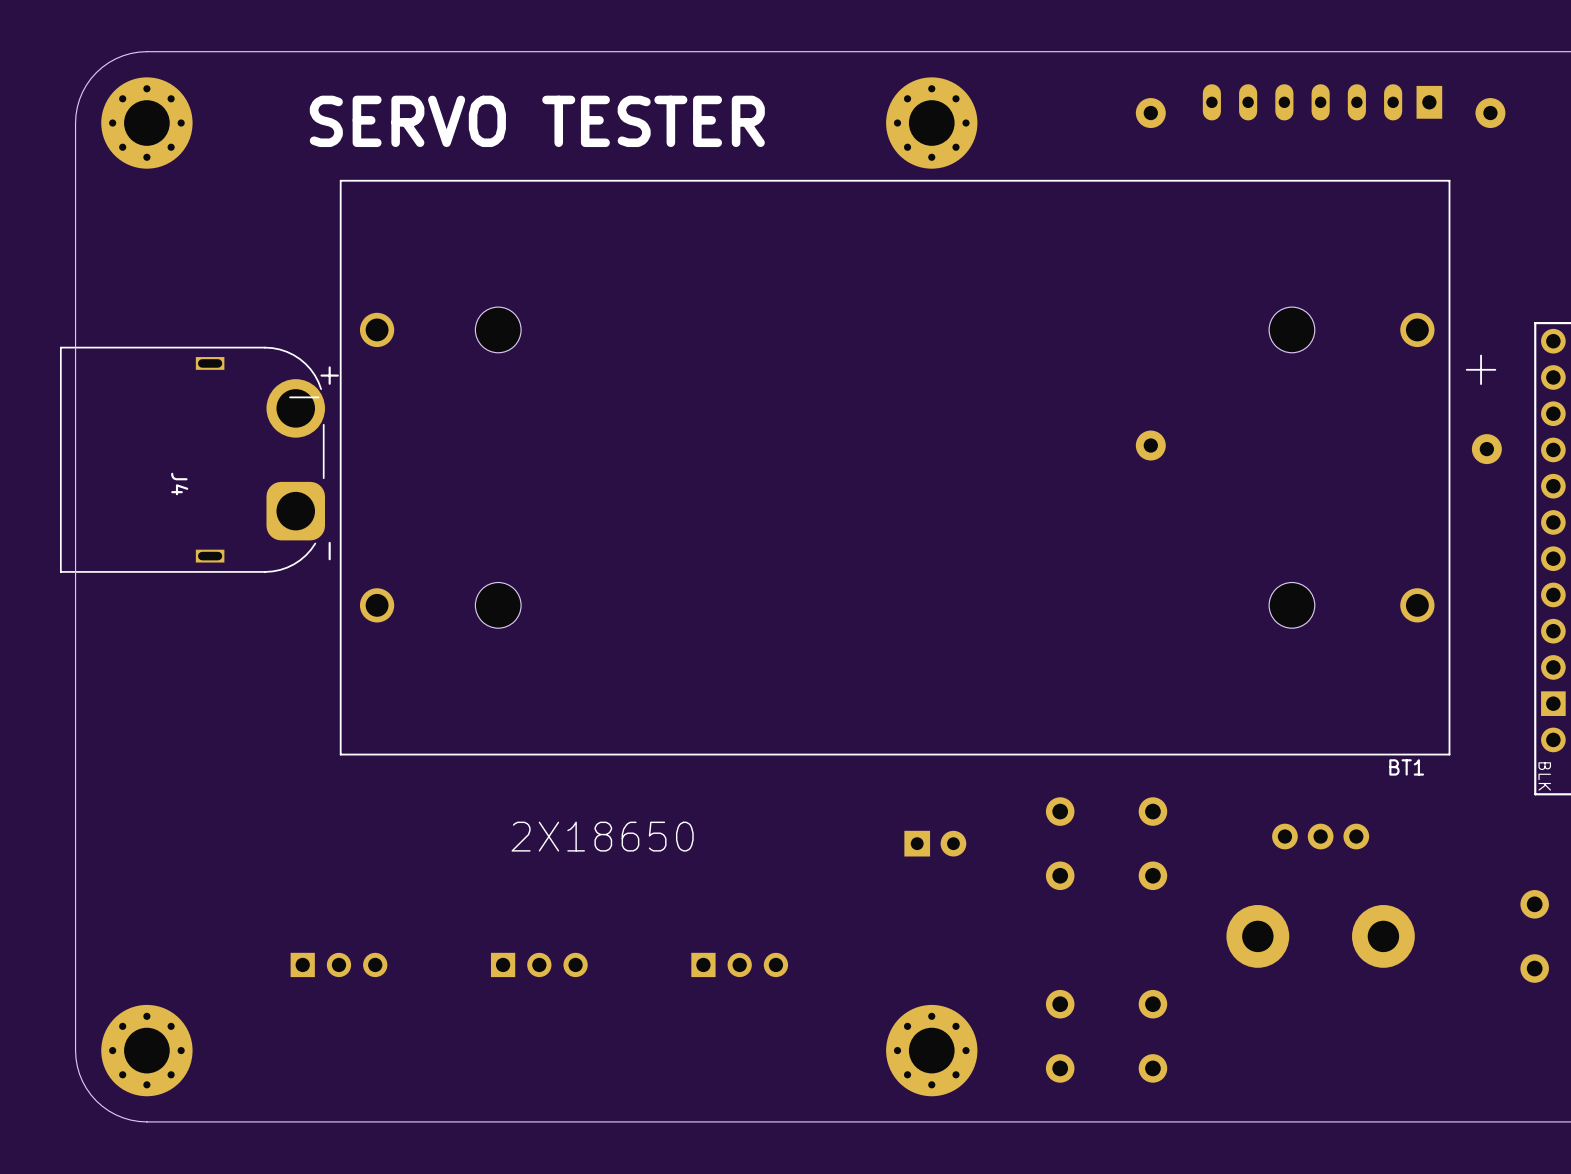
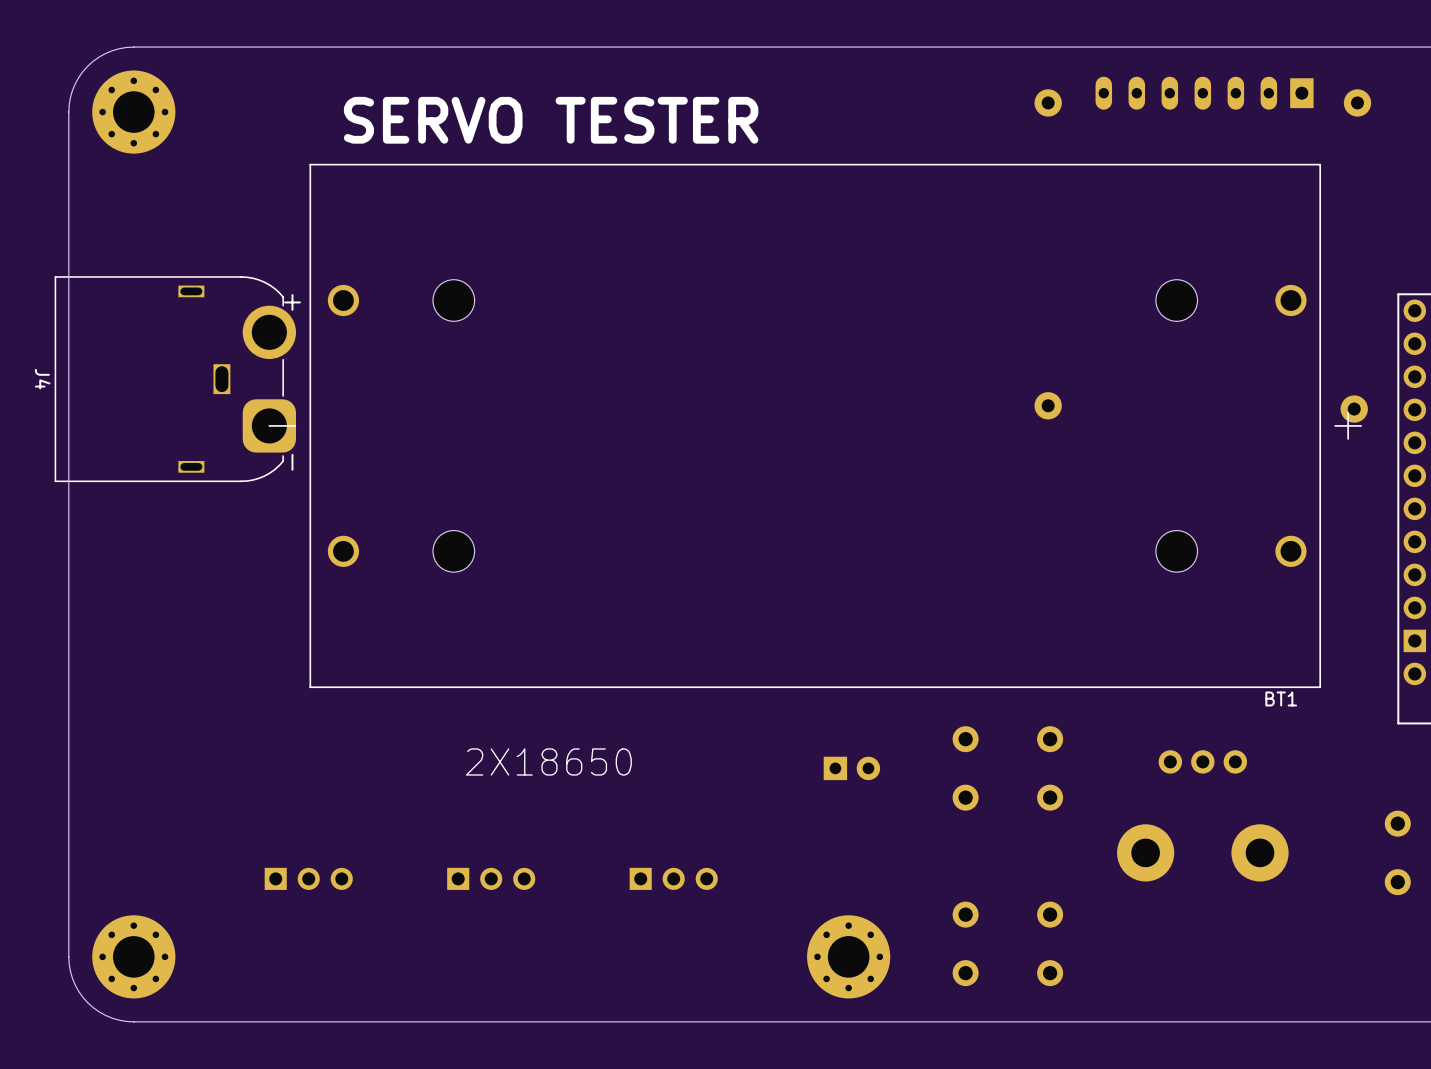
text position: SERVO TESTER (537, 121) -> SERVO TESTER (551, 120)
part: (931, 123) -> none
BT1 footprint: [289, 179, 1497, 756] -> [268, 163, 1362, 689]
J4 footprint: [60, 346, 325, 573] -> [54, 276, 297, 483]
J4 name position: J4 (179, 484) -> J4 (42, 379)
part text: BLK (1544, 776) -> none

